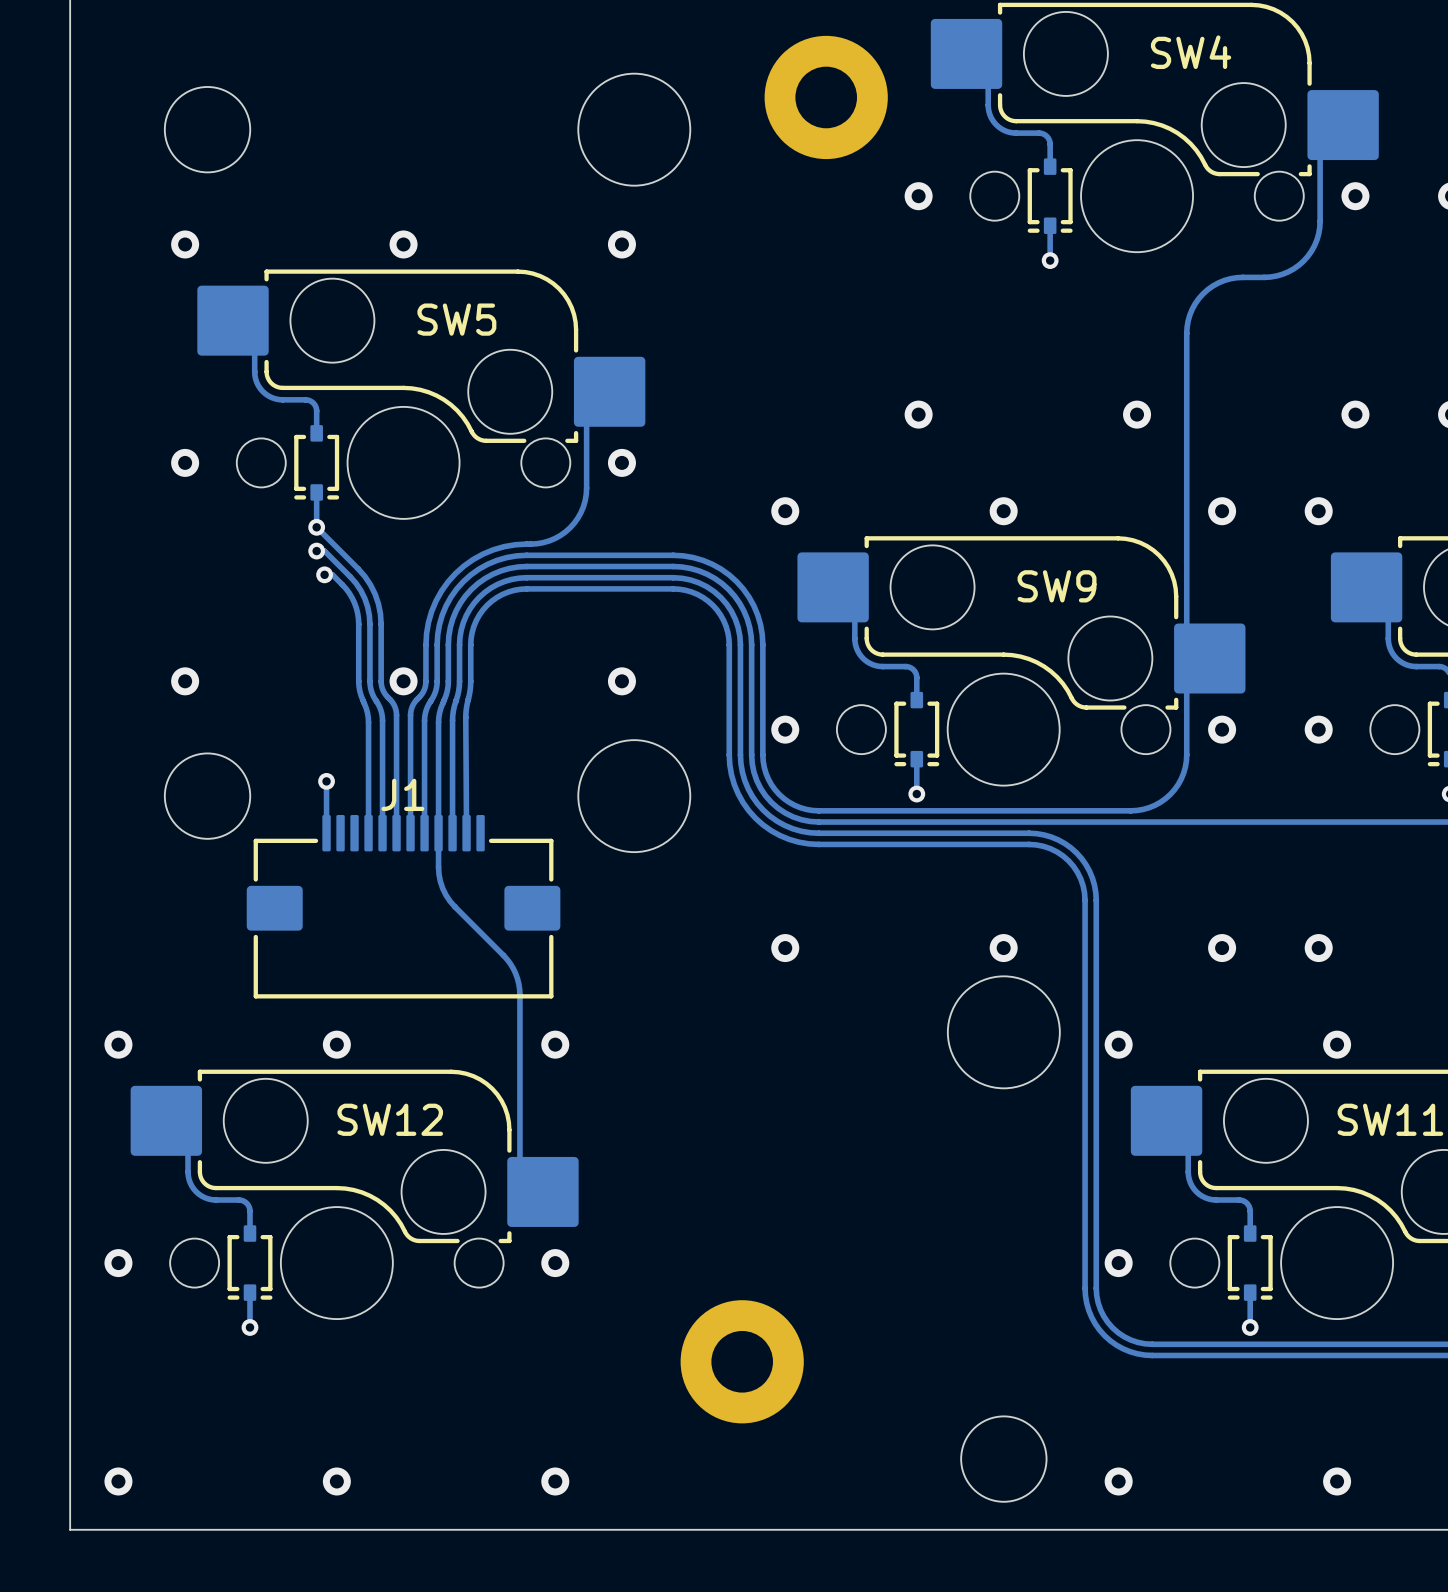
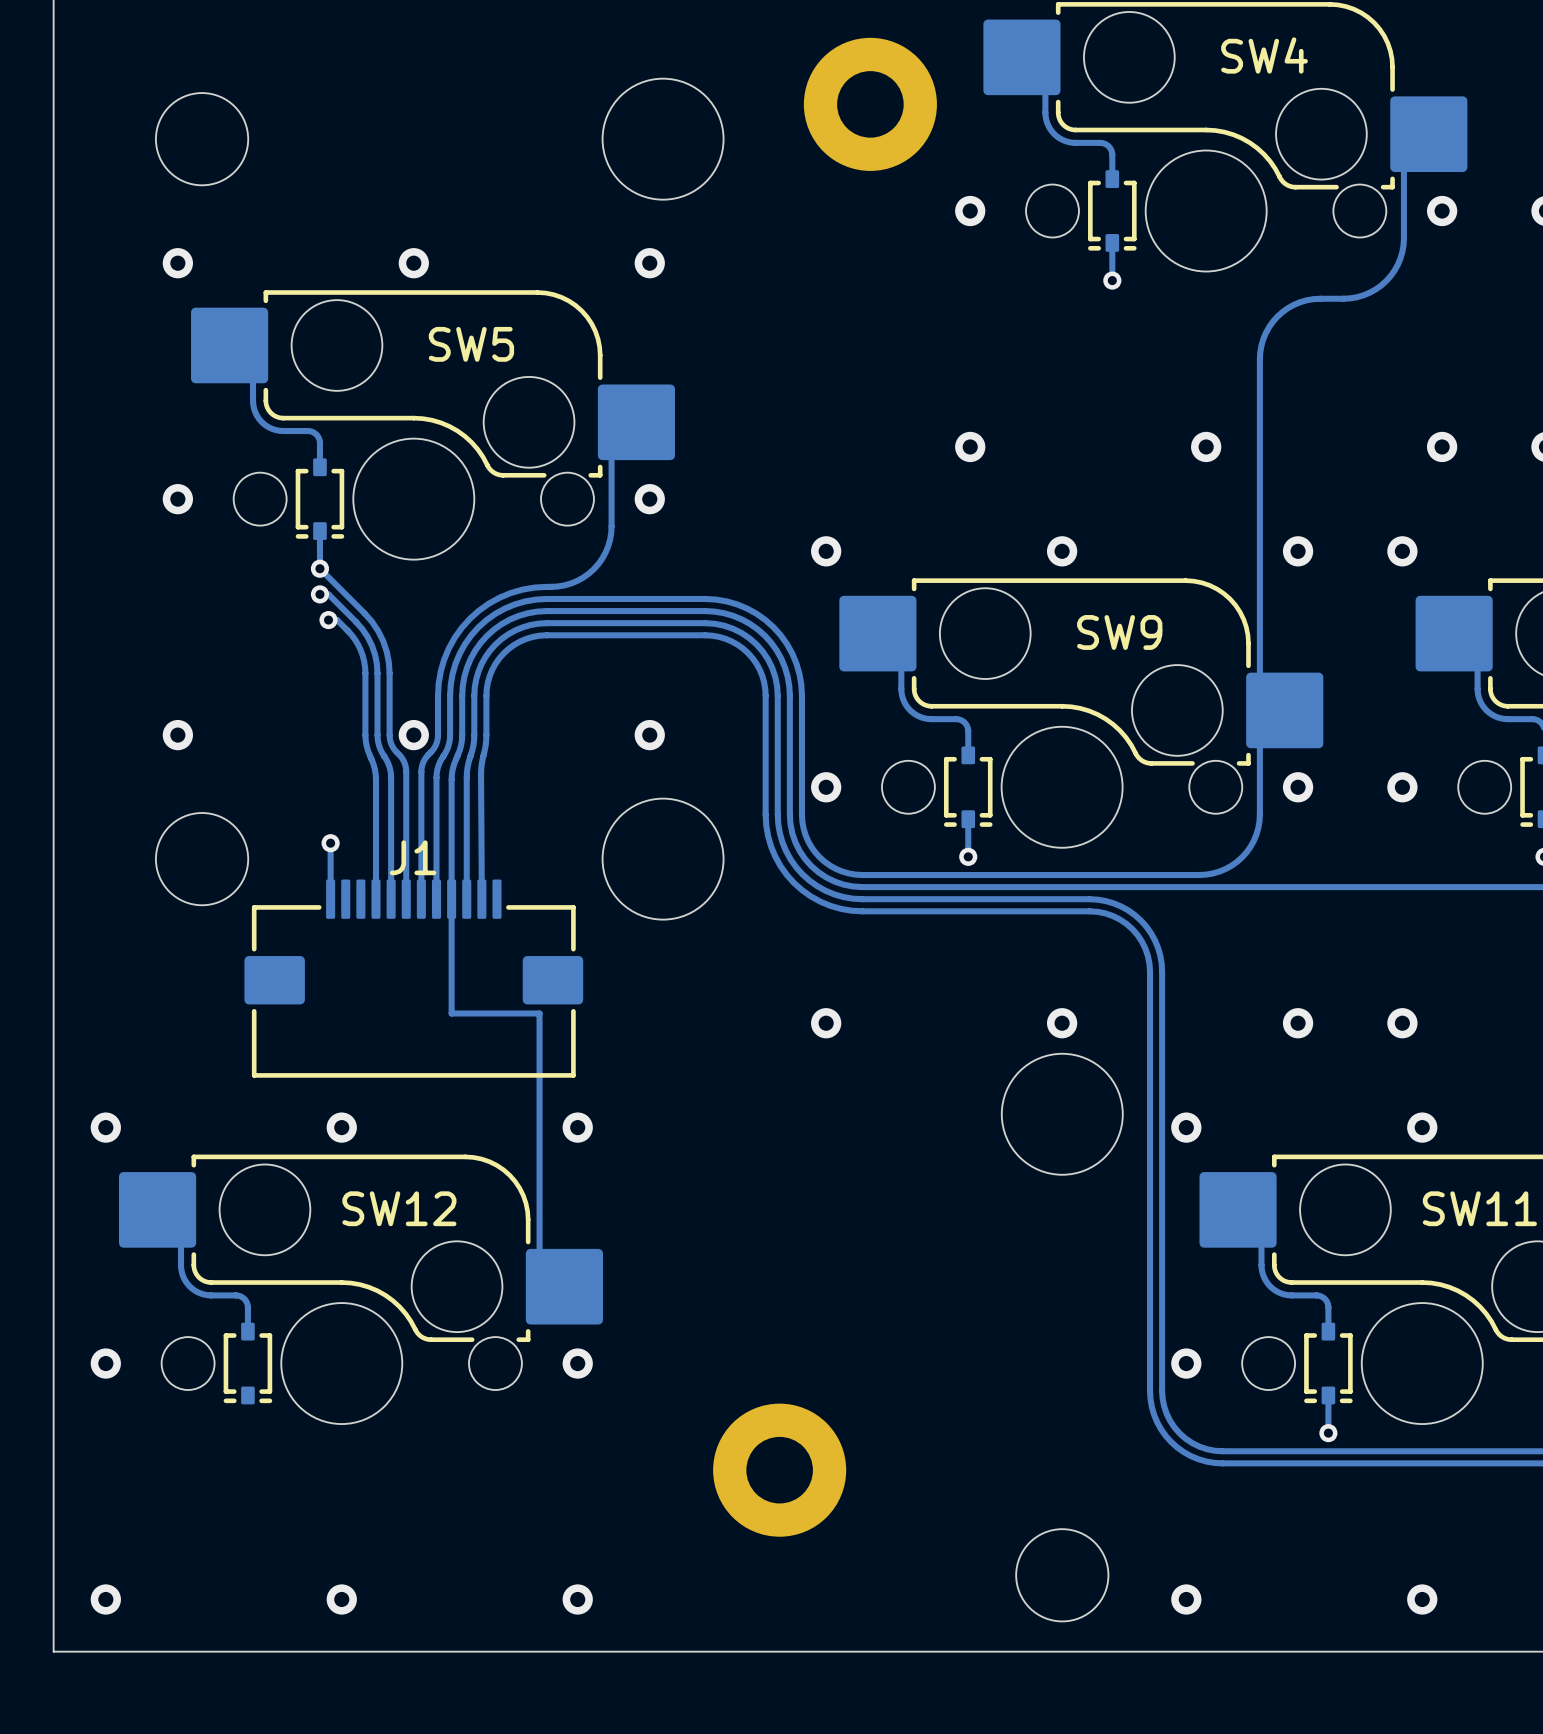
track: (438, 867) (440, 881) (450, 901) (510, 963) (517, 978) (519, 995) -> (451, 935) (451, 1013) (539, 1013) (539, 1074)
track: (249, 1292) (249, 1327) -> none
via: (249, 1327) -> none

